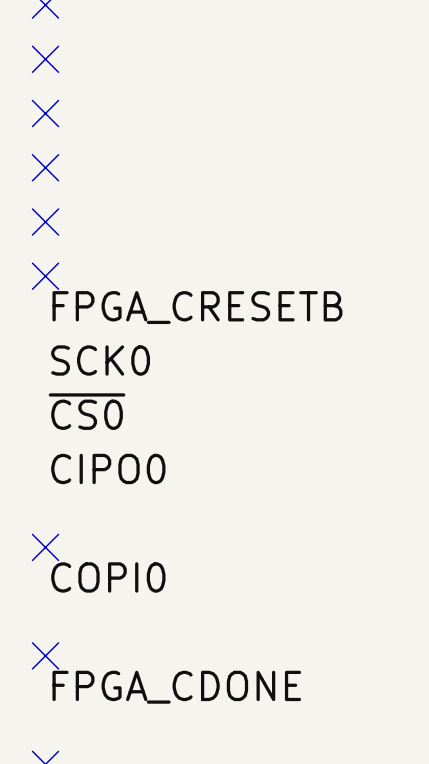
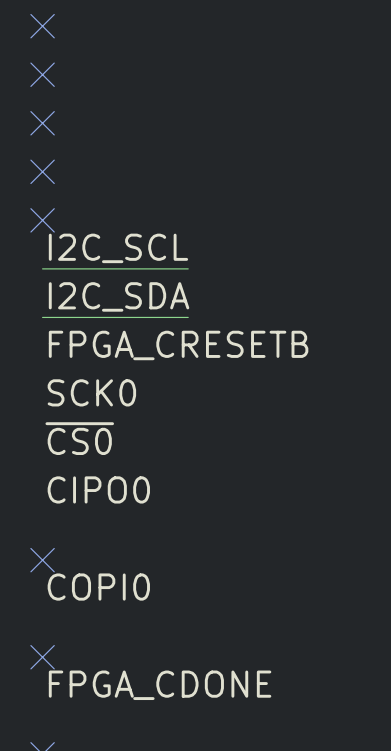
label: none -> I2C_SCL (118, 248)
wire: none -> (42, 268) (188, 268)
no-connect mark: (45, 221) -> none
label: none -> I2C_SDA (119, 296)
wire: none -> (42, 317) (188, 317)
no-connect mark: (45, 276) -> none

